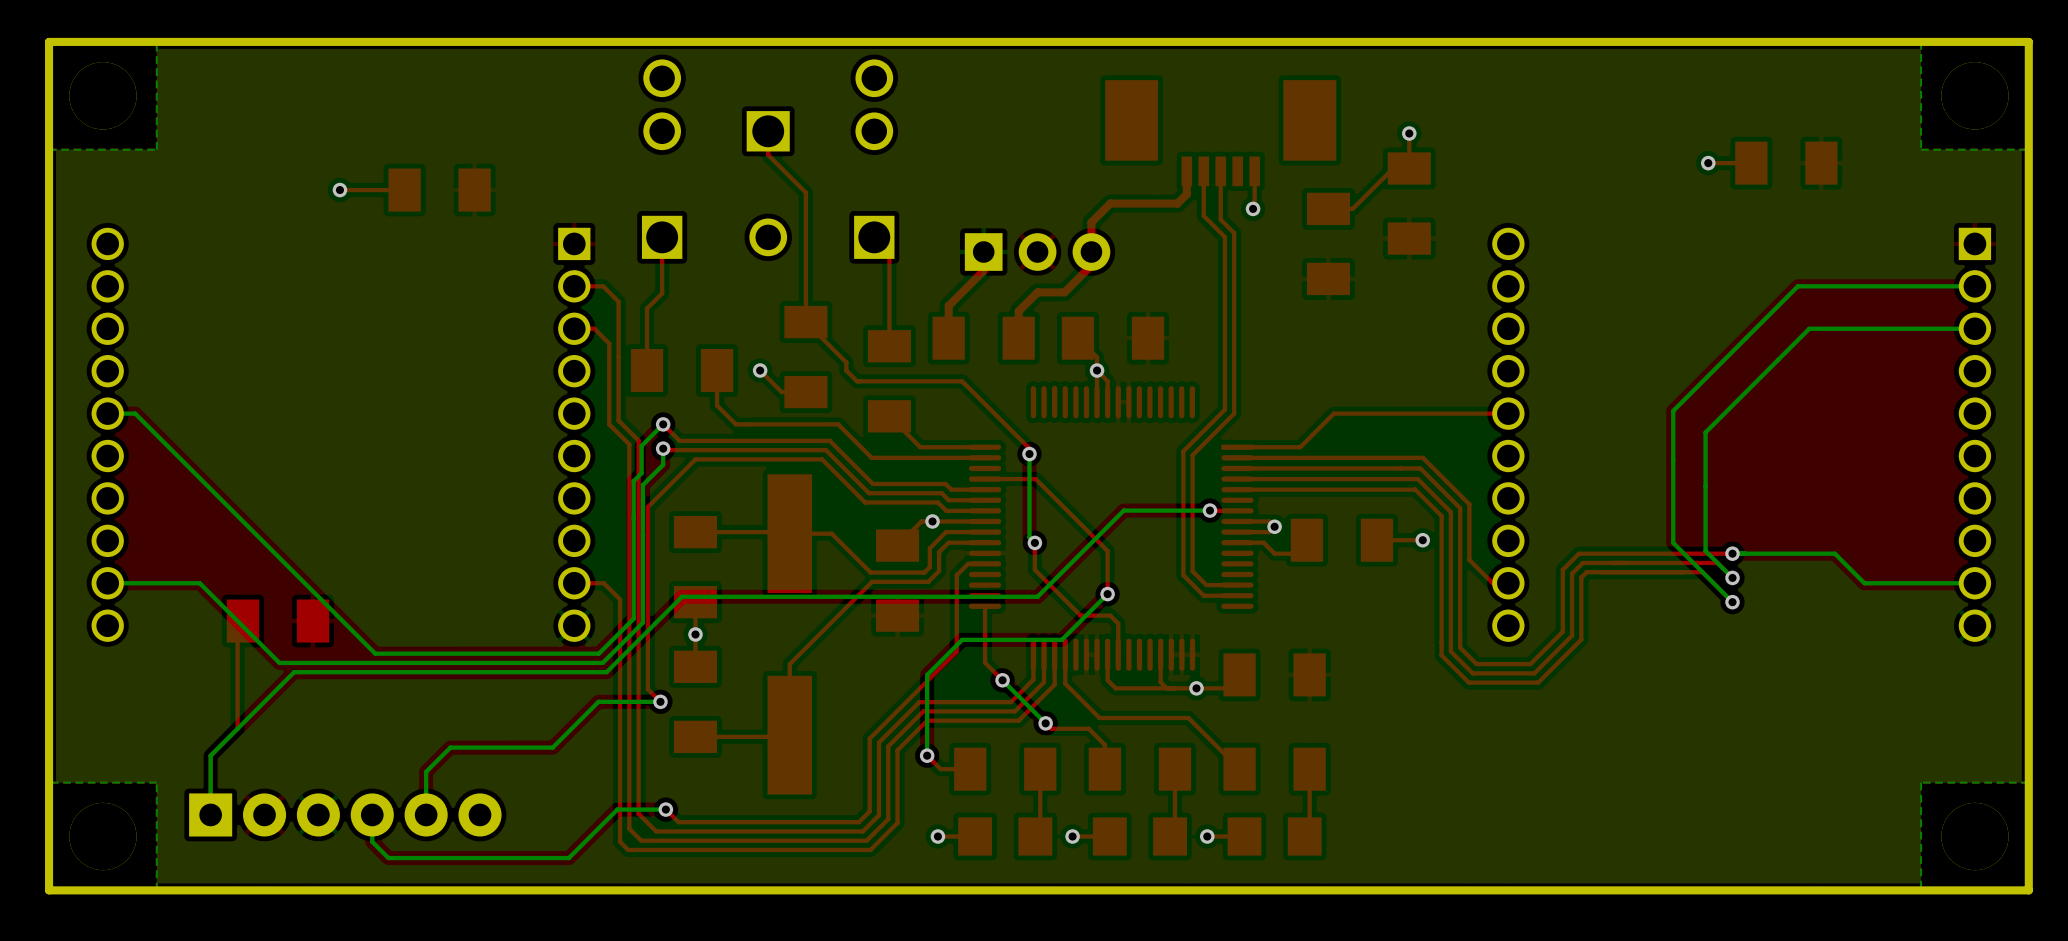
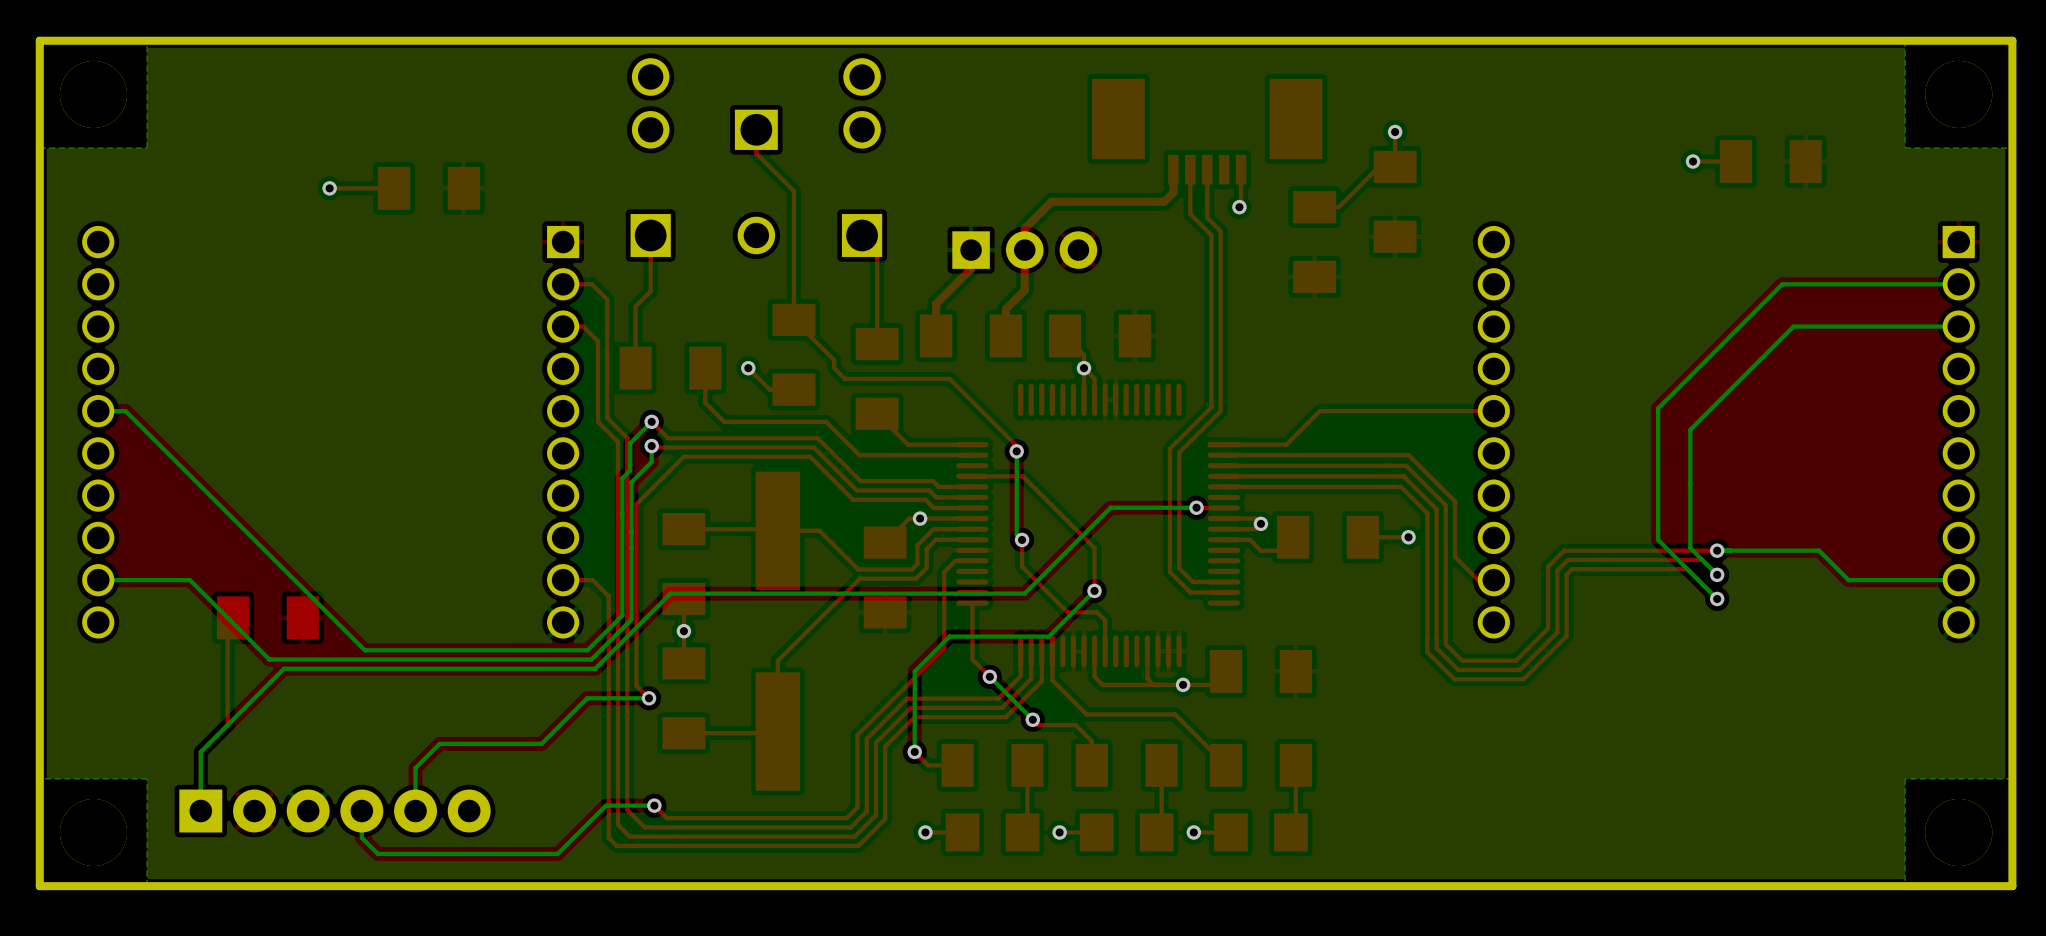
top track: (1110, 203) (1091, 222) (1091, 265) (1064, 292) (1037, 292) -> (1097, 201) (1051, 201) (1024, 228) (1024, 290)

